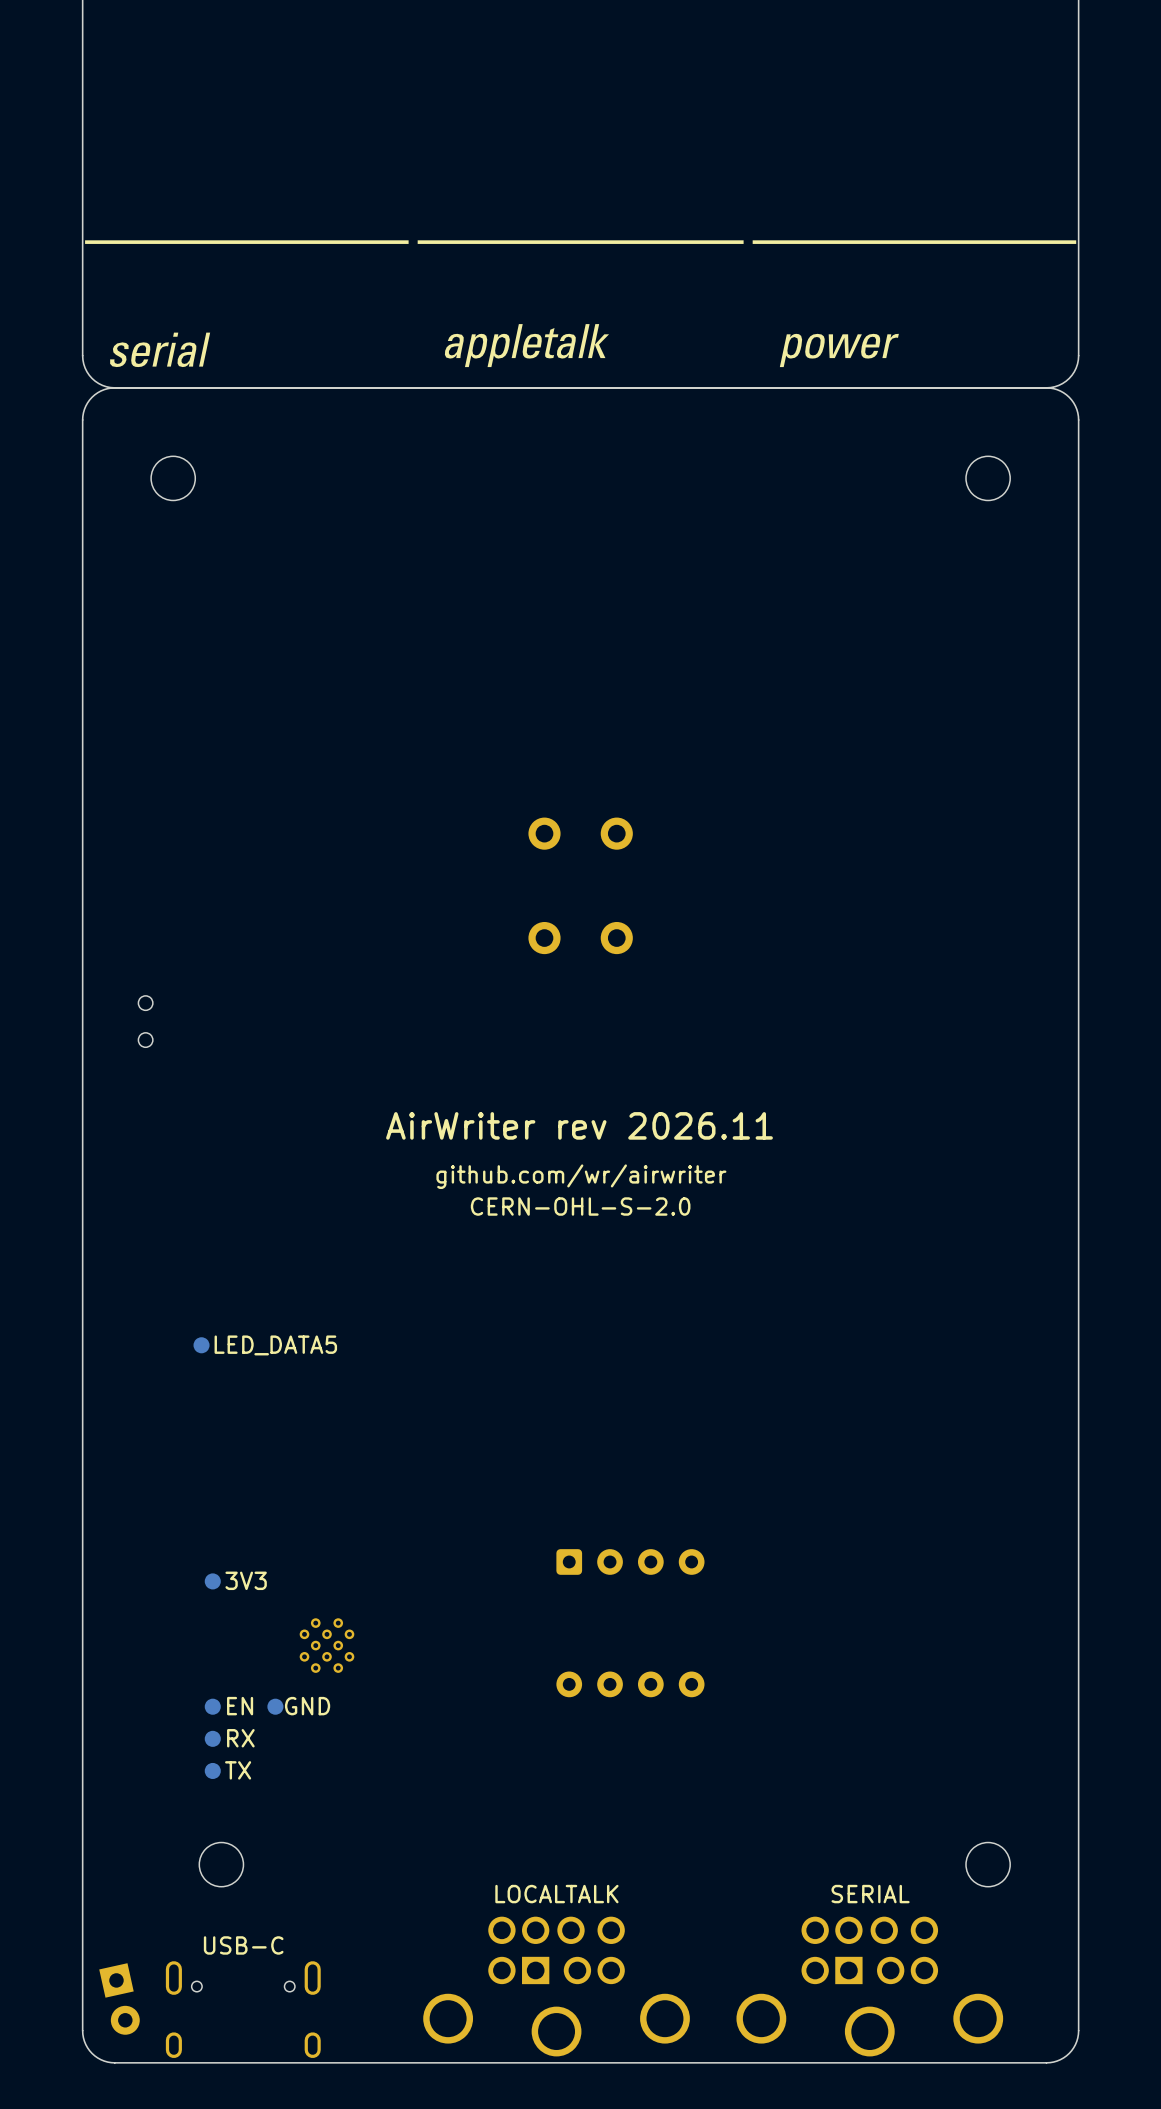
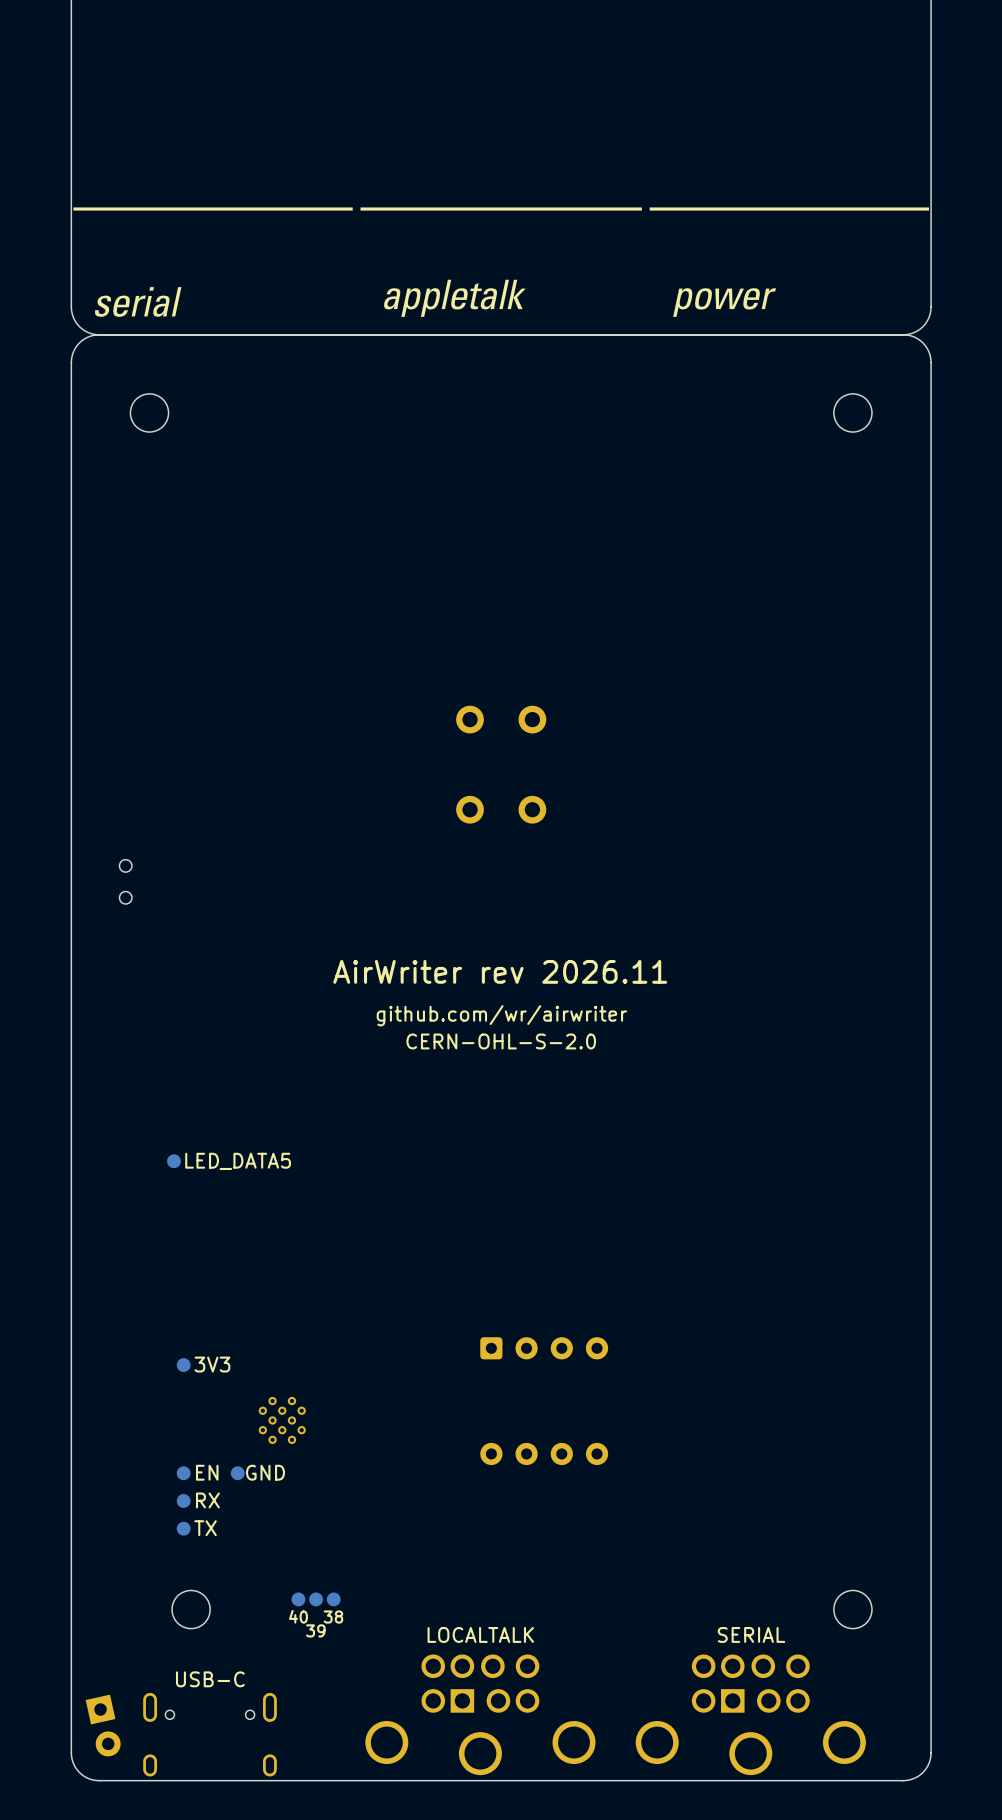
part: none -> (298, 1599)
part: none -> (316, 1599)
part: none -> (333, 1599)

